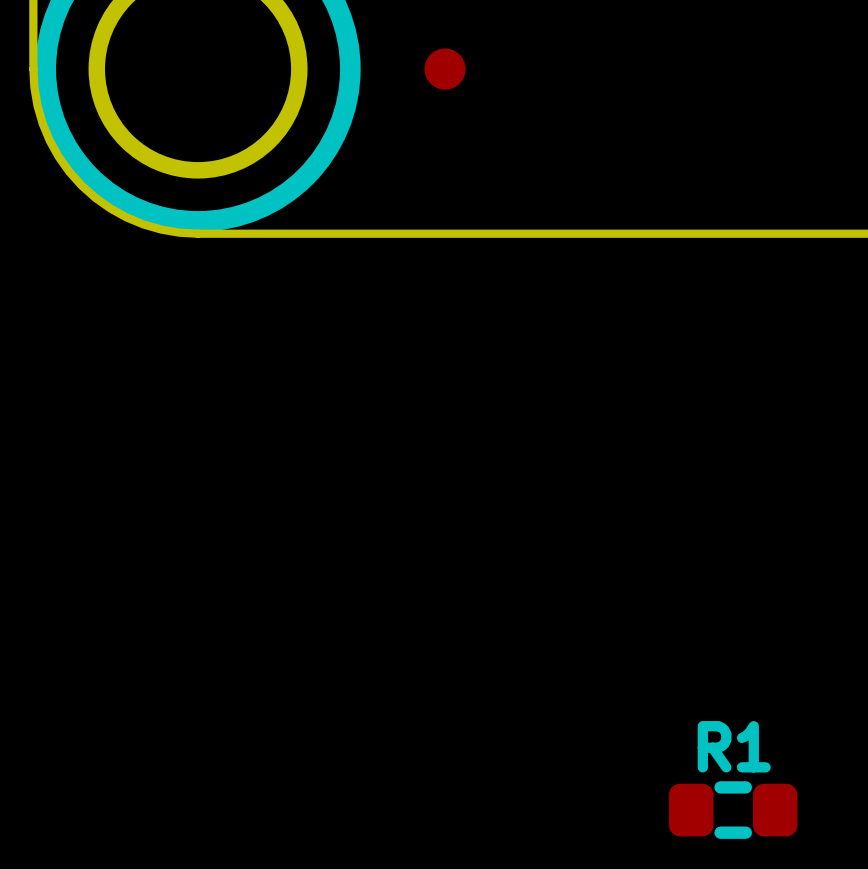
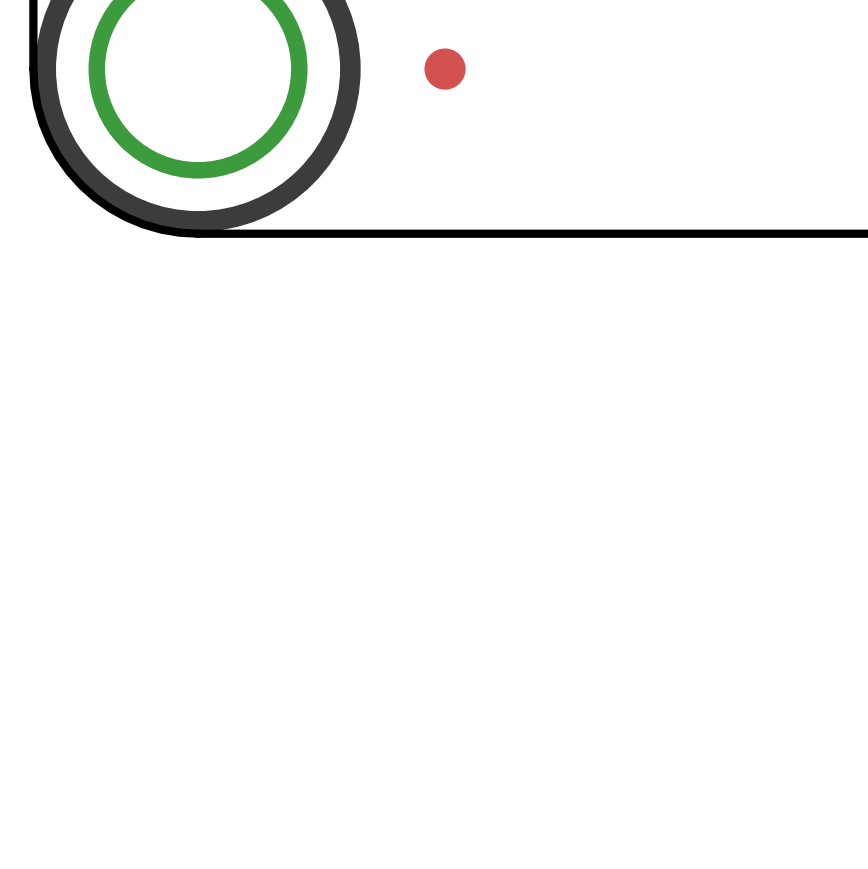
R1: (733, 810) -> none

